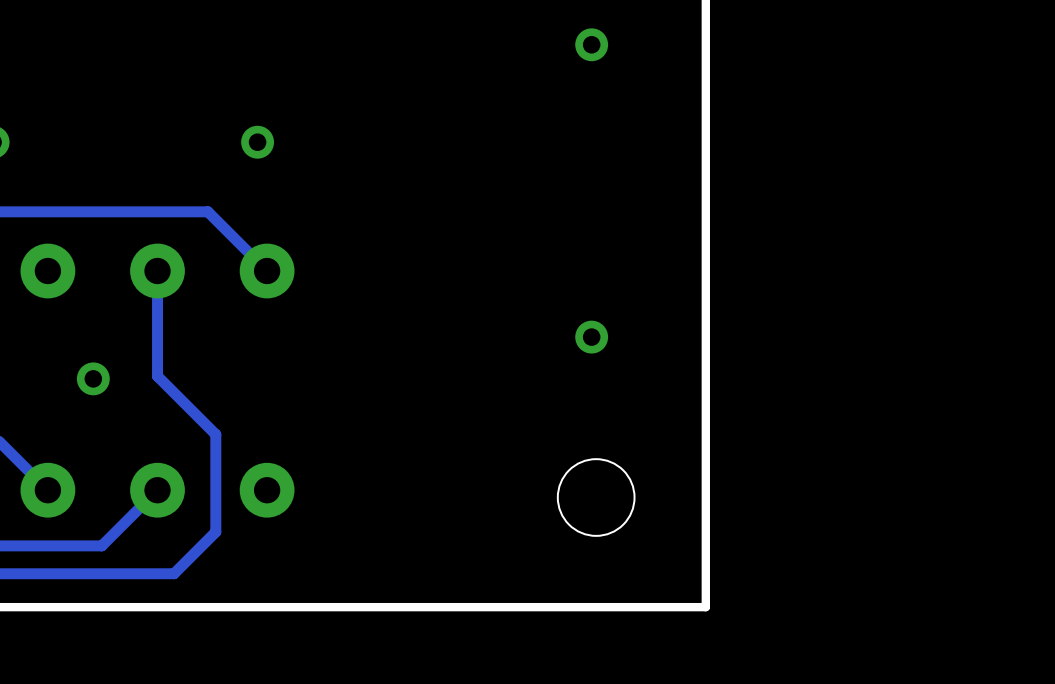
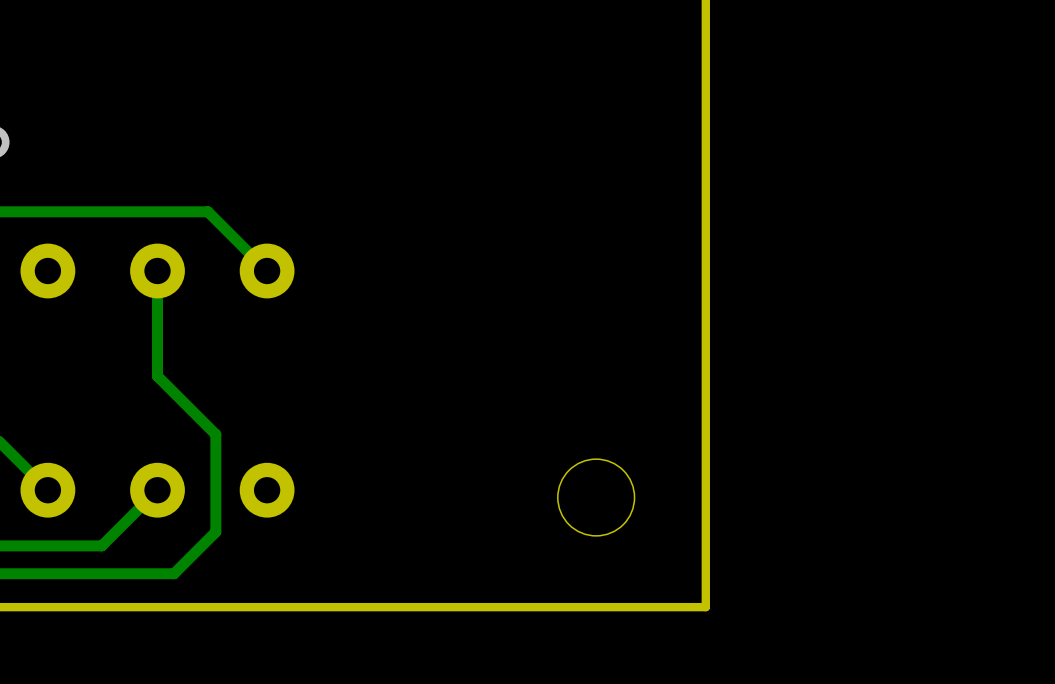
via: (591, 44) -> none
via: (257, 142) -> none
via: (591, 337) -> none
via: (93, 378) -> none

